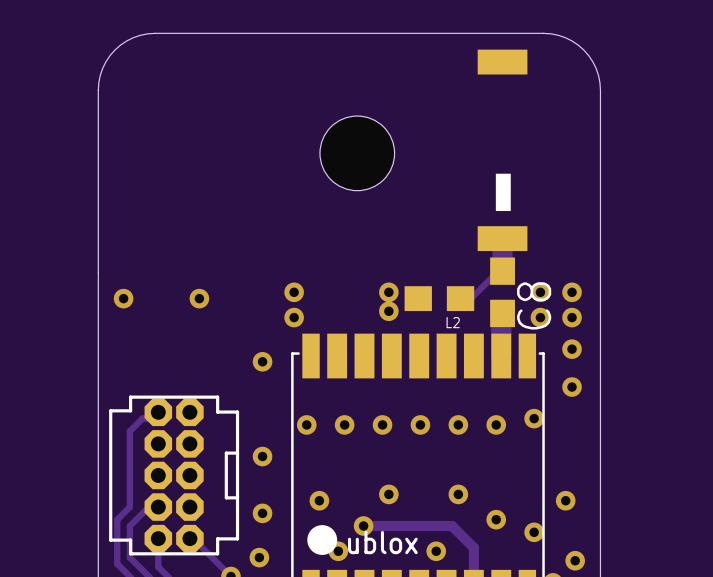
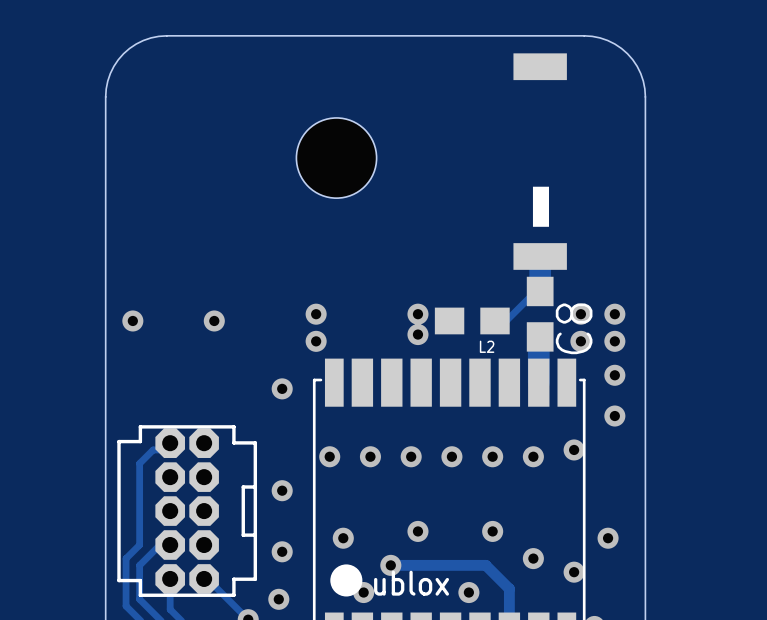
hole position: (357, 153) -> (336, 158)
via: (575, 560) -> none

